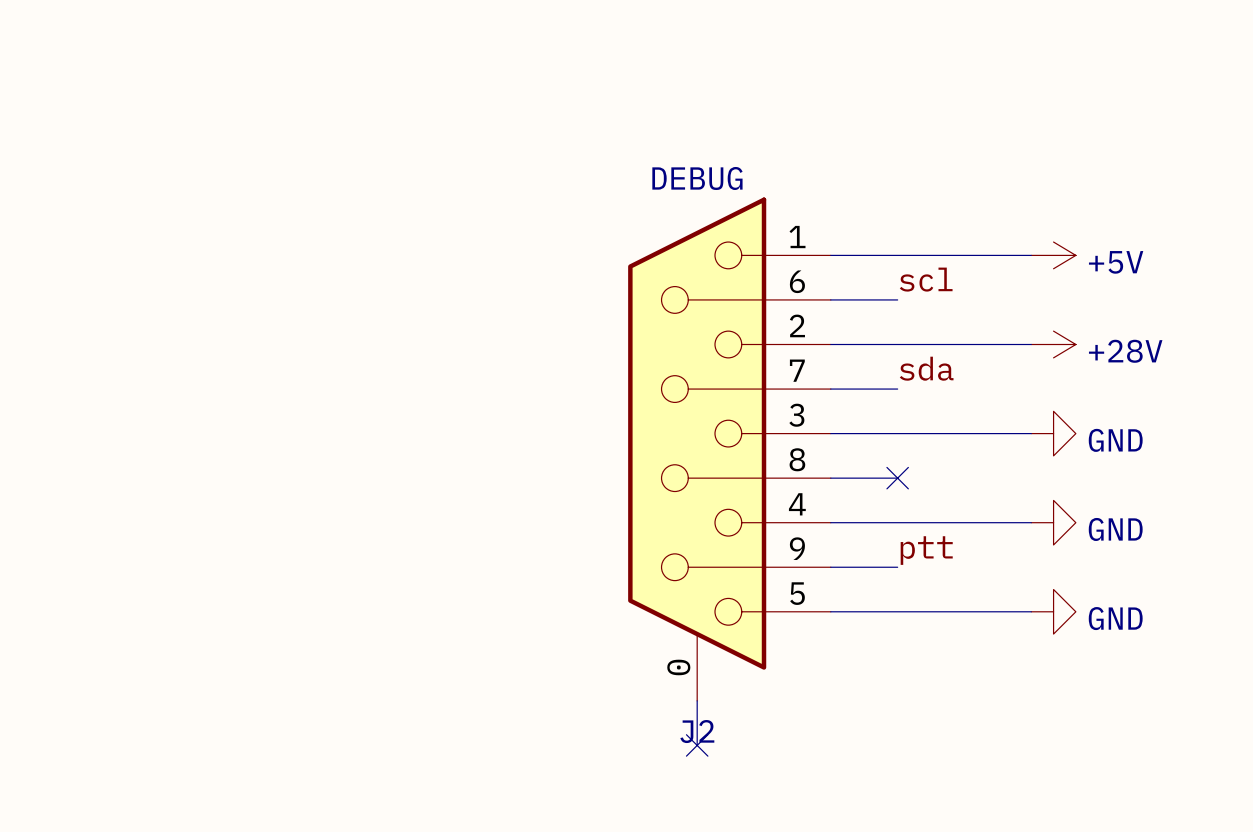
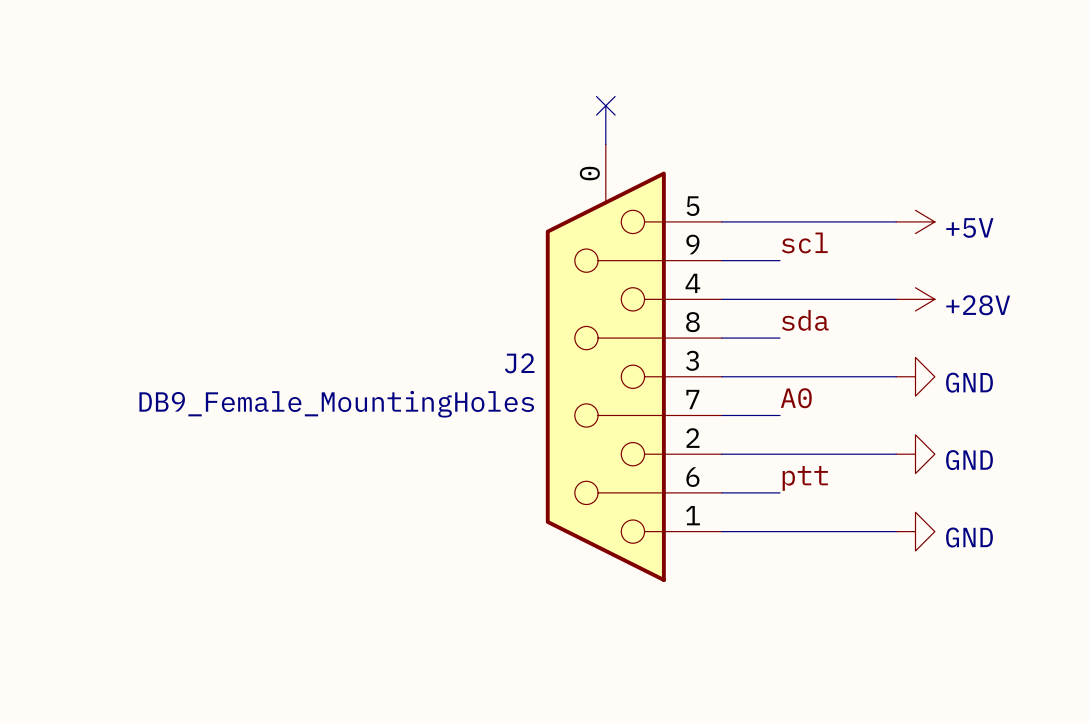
wire: none -> (605, 105) (605, 144)
no-connect mark: none -> (605, 105)
J2 value: DEBUG (697, 178) -> DB9_Female_MountingHoles (336, 404)
J2 flip: as is (697, 433) -> up-down (605, 376)
label: none -> A0 (796, 398)
no-connect mark: (897, 478) -> none
wire: (697, 700) (697, 745) -> none
J2 name position: J2 (697, 731) -> J2 (519, 363)
no-connect mark: (697, 745) -> none

